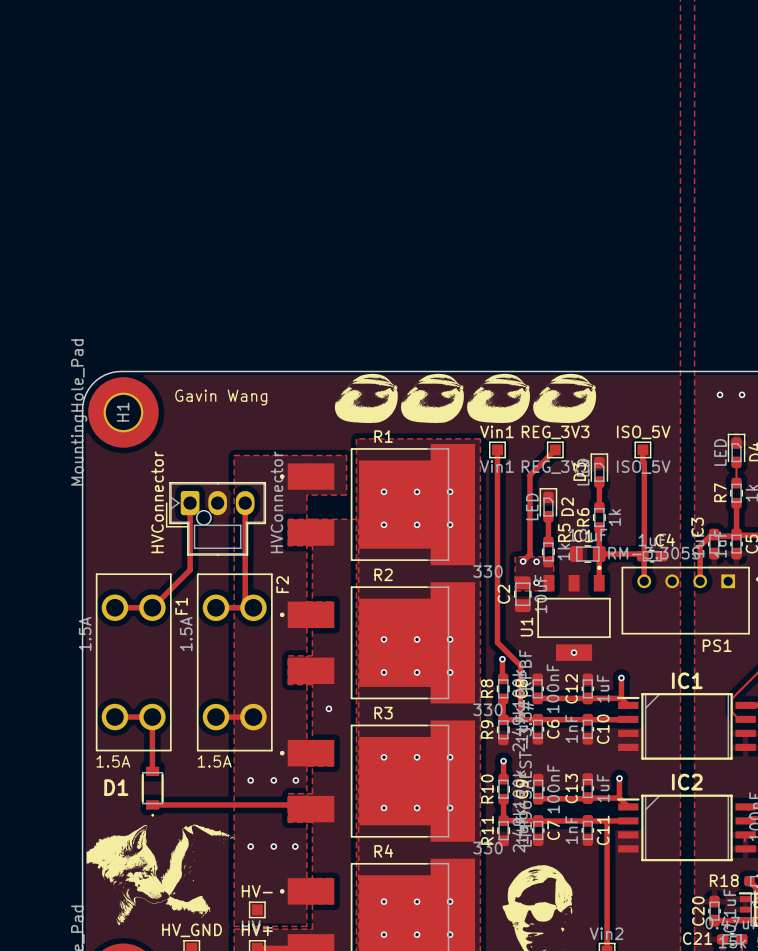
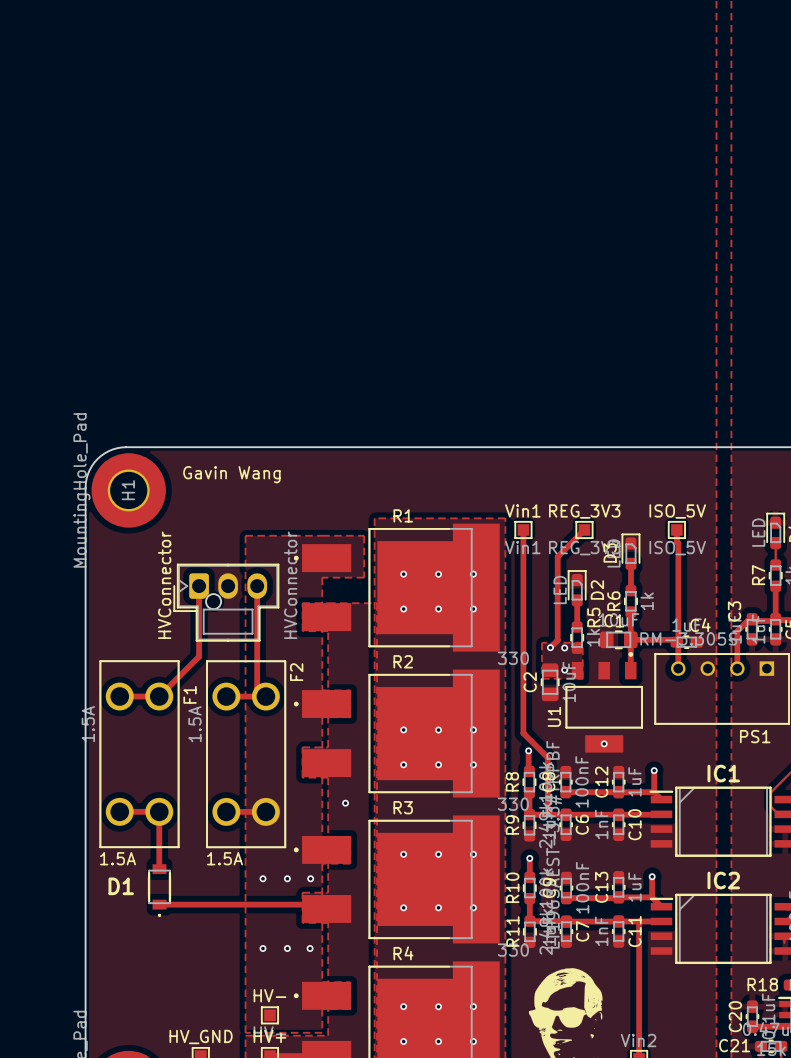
drawing: [334, 373, 597, 424] -> none
via: (720, 394) -> none
via: (742, 394) -> none
drawing: [86, 824, 252, 926] -> none

